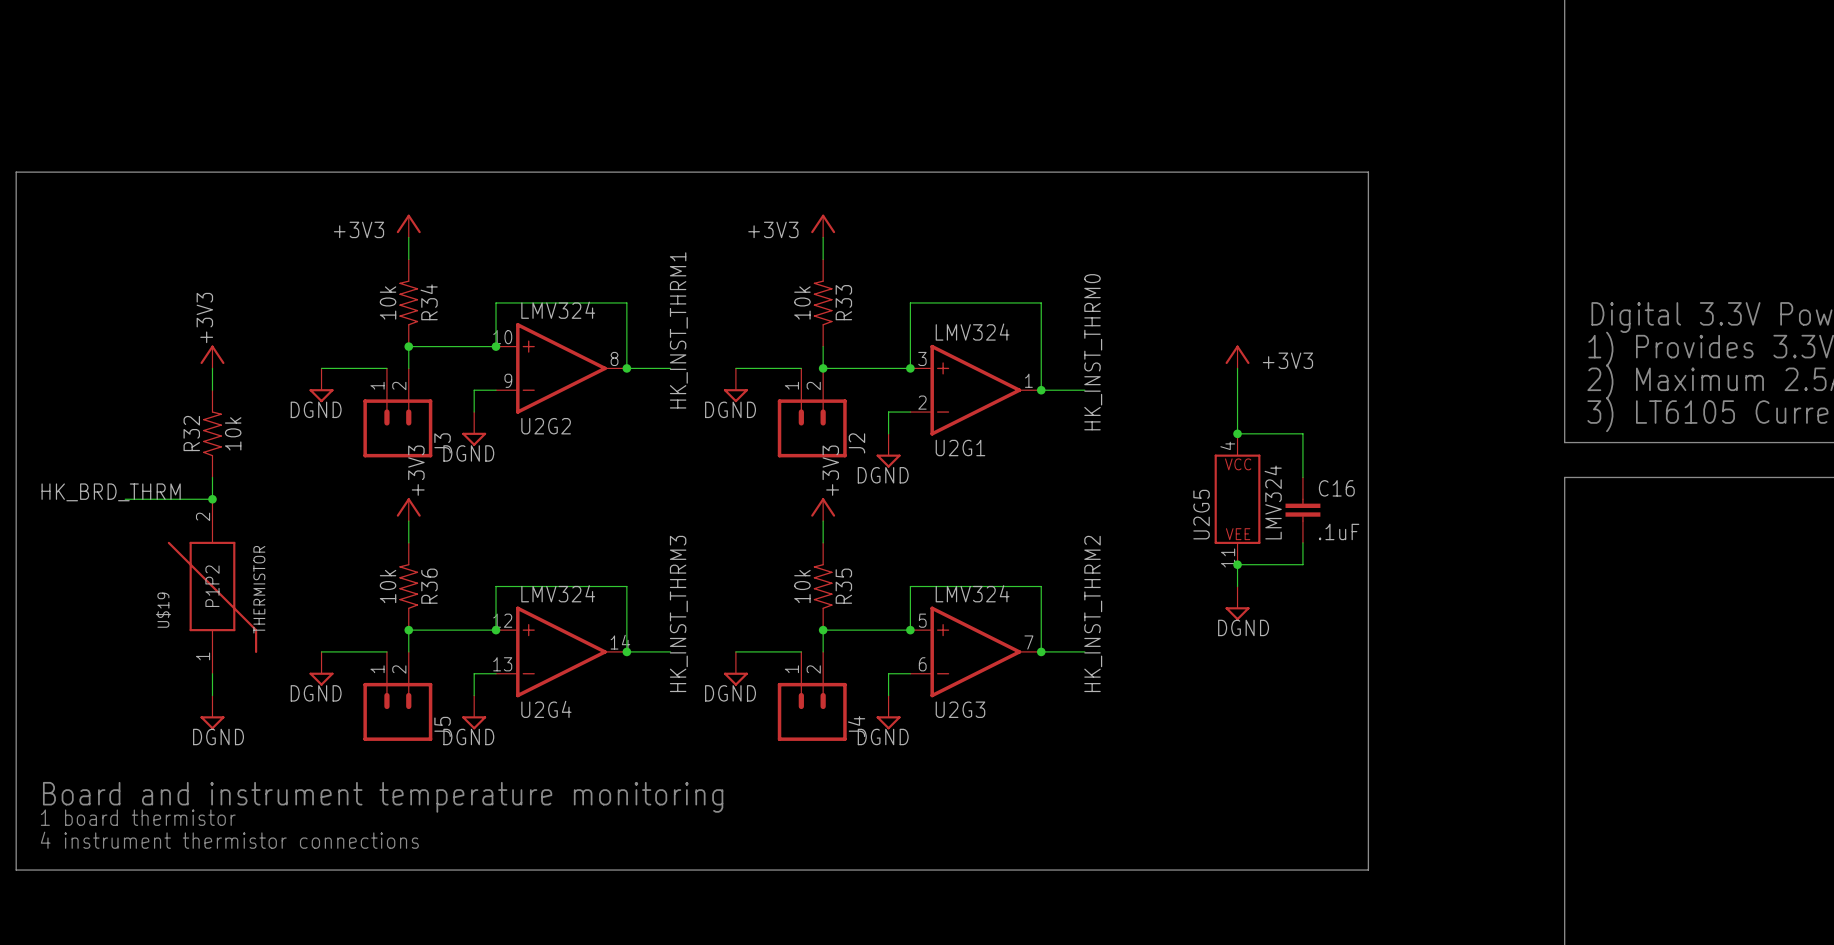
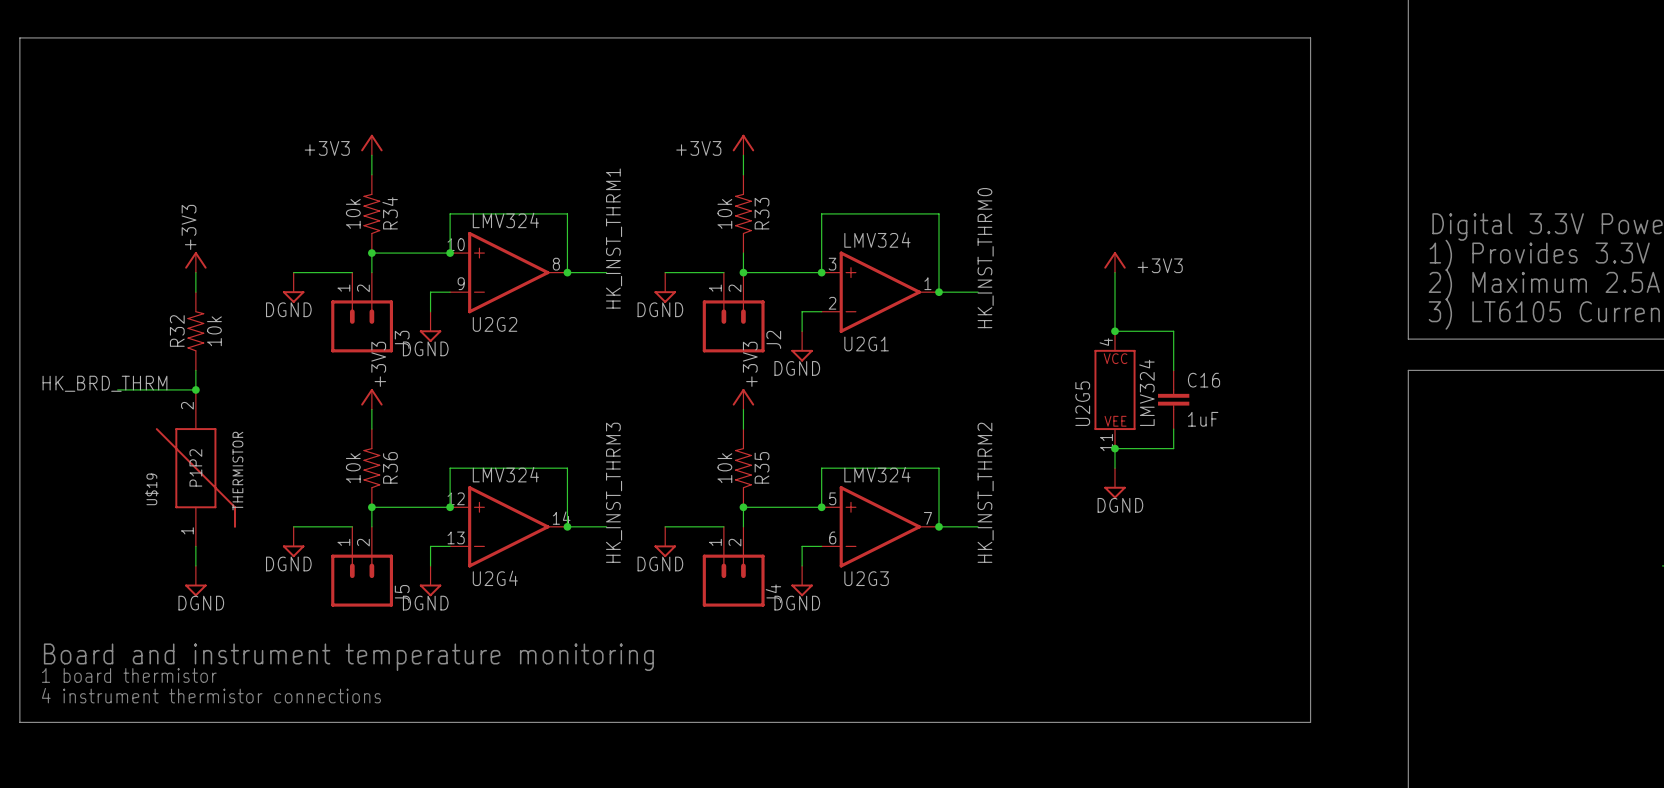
line: (16, 172) (1368, 172) (1368, 870) -> (19, 96) (19, 37) (1310, 37) (1310, 722) (1232, 722)
C16 value: .1uF (1339, 531) -> 1uF (1203, 419)

